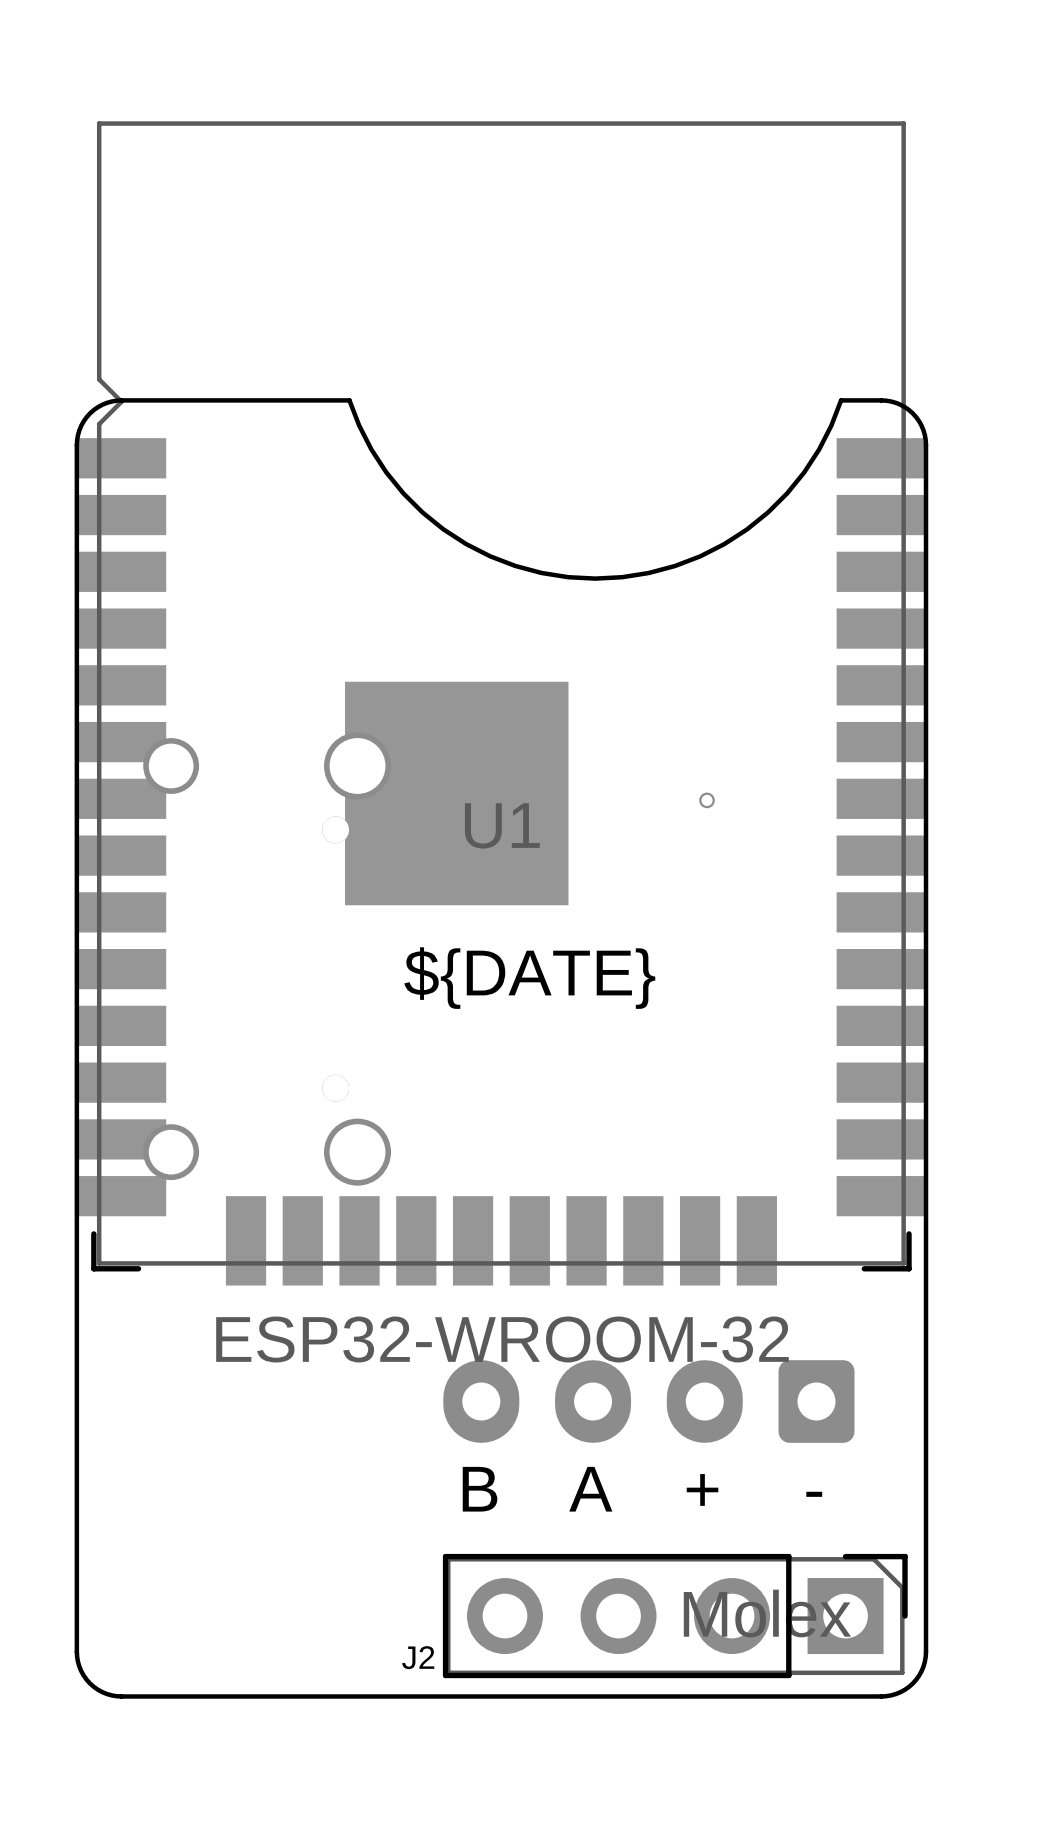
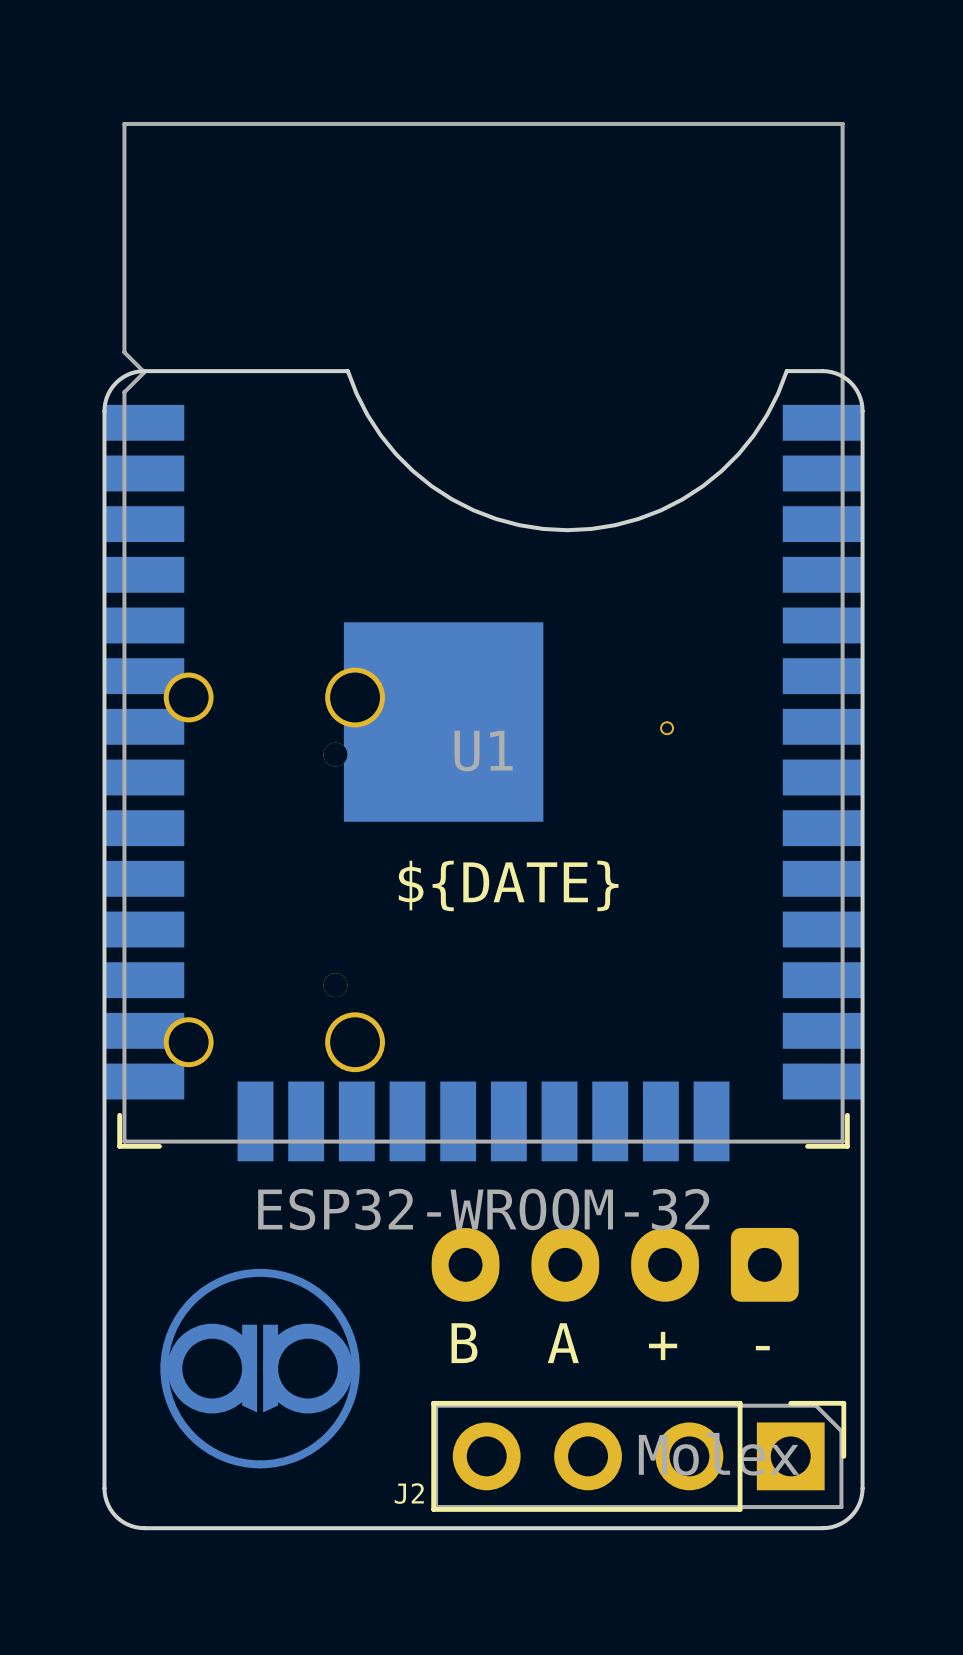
part: none -> (260, 1368)

